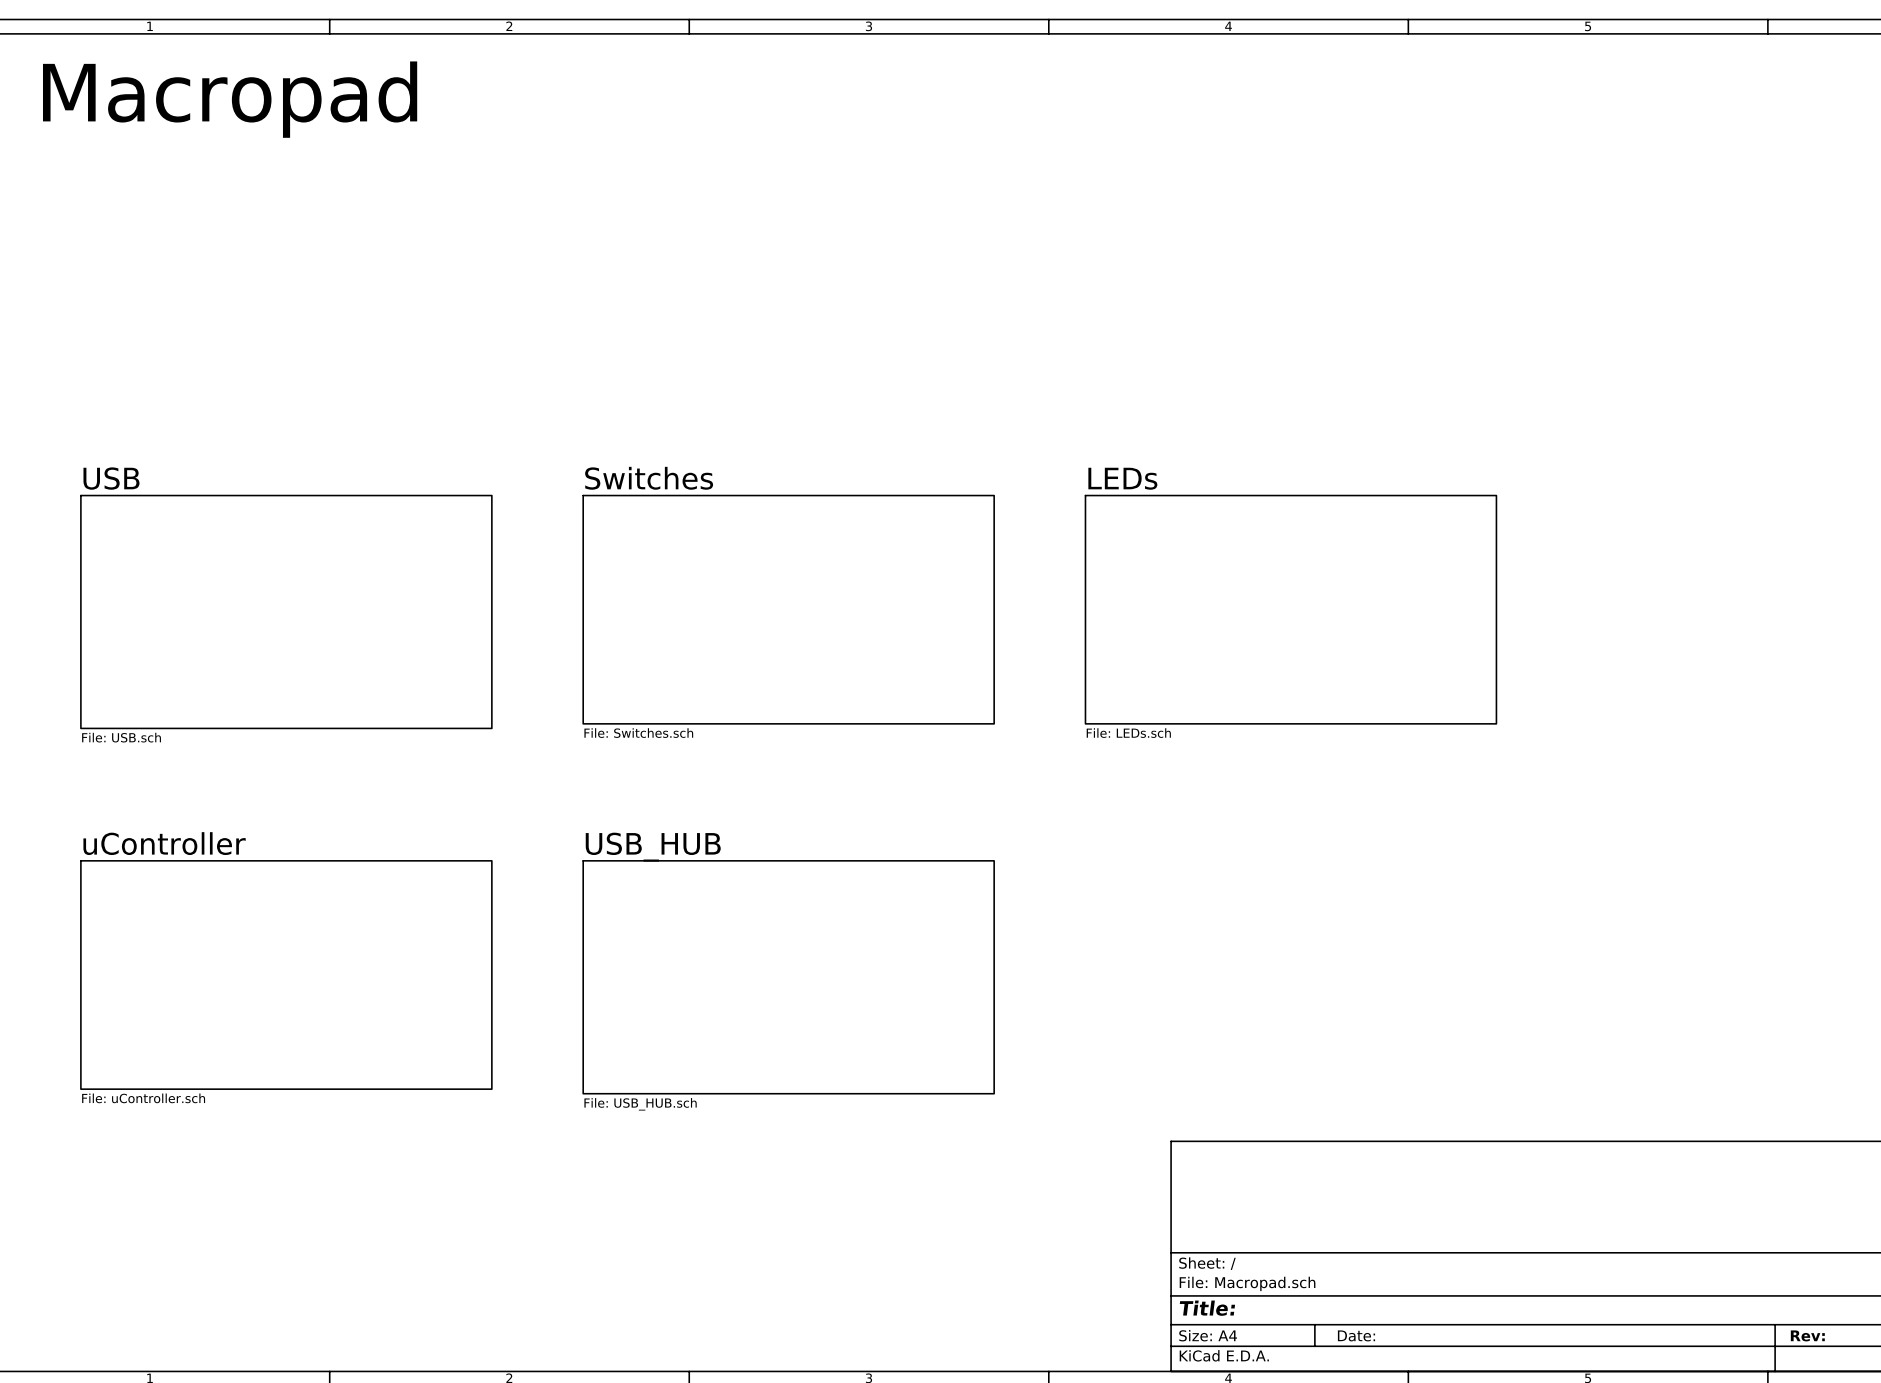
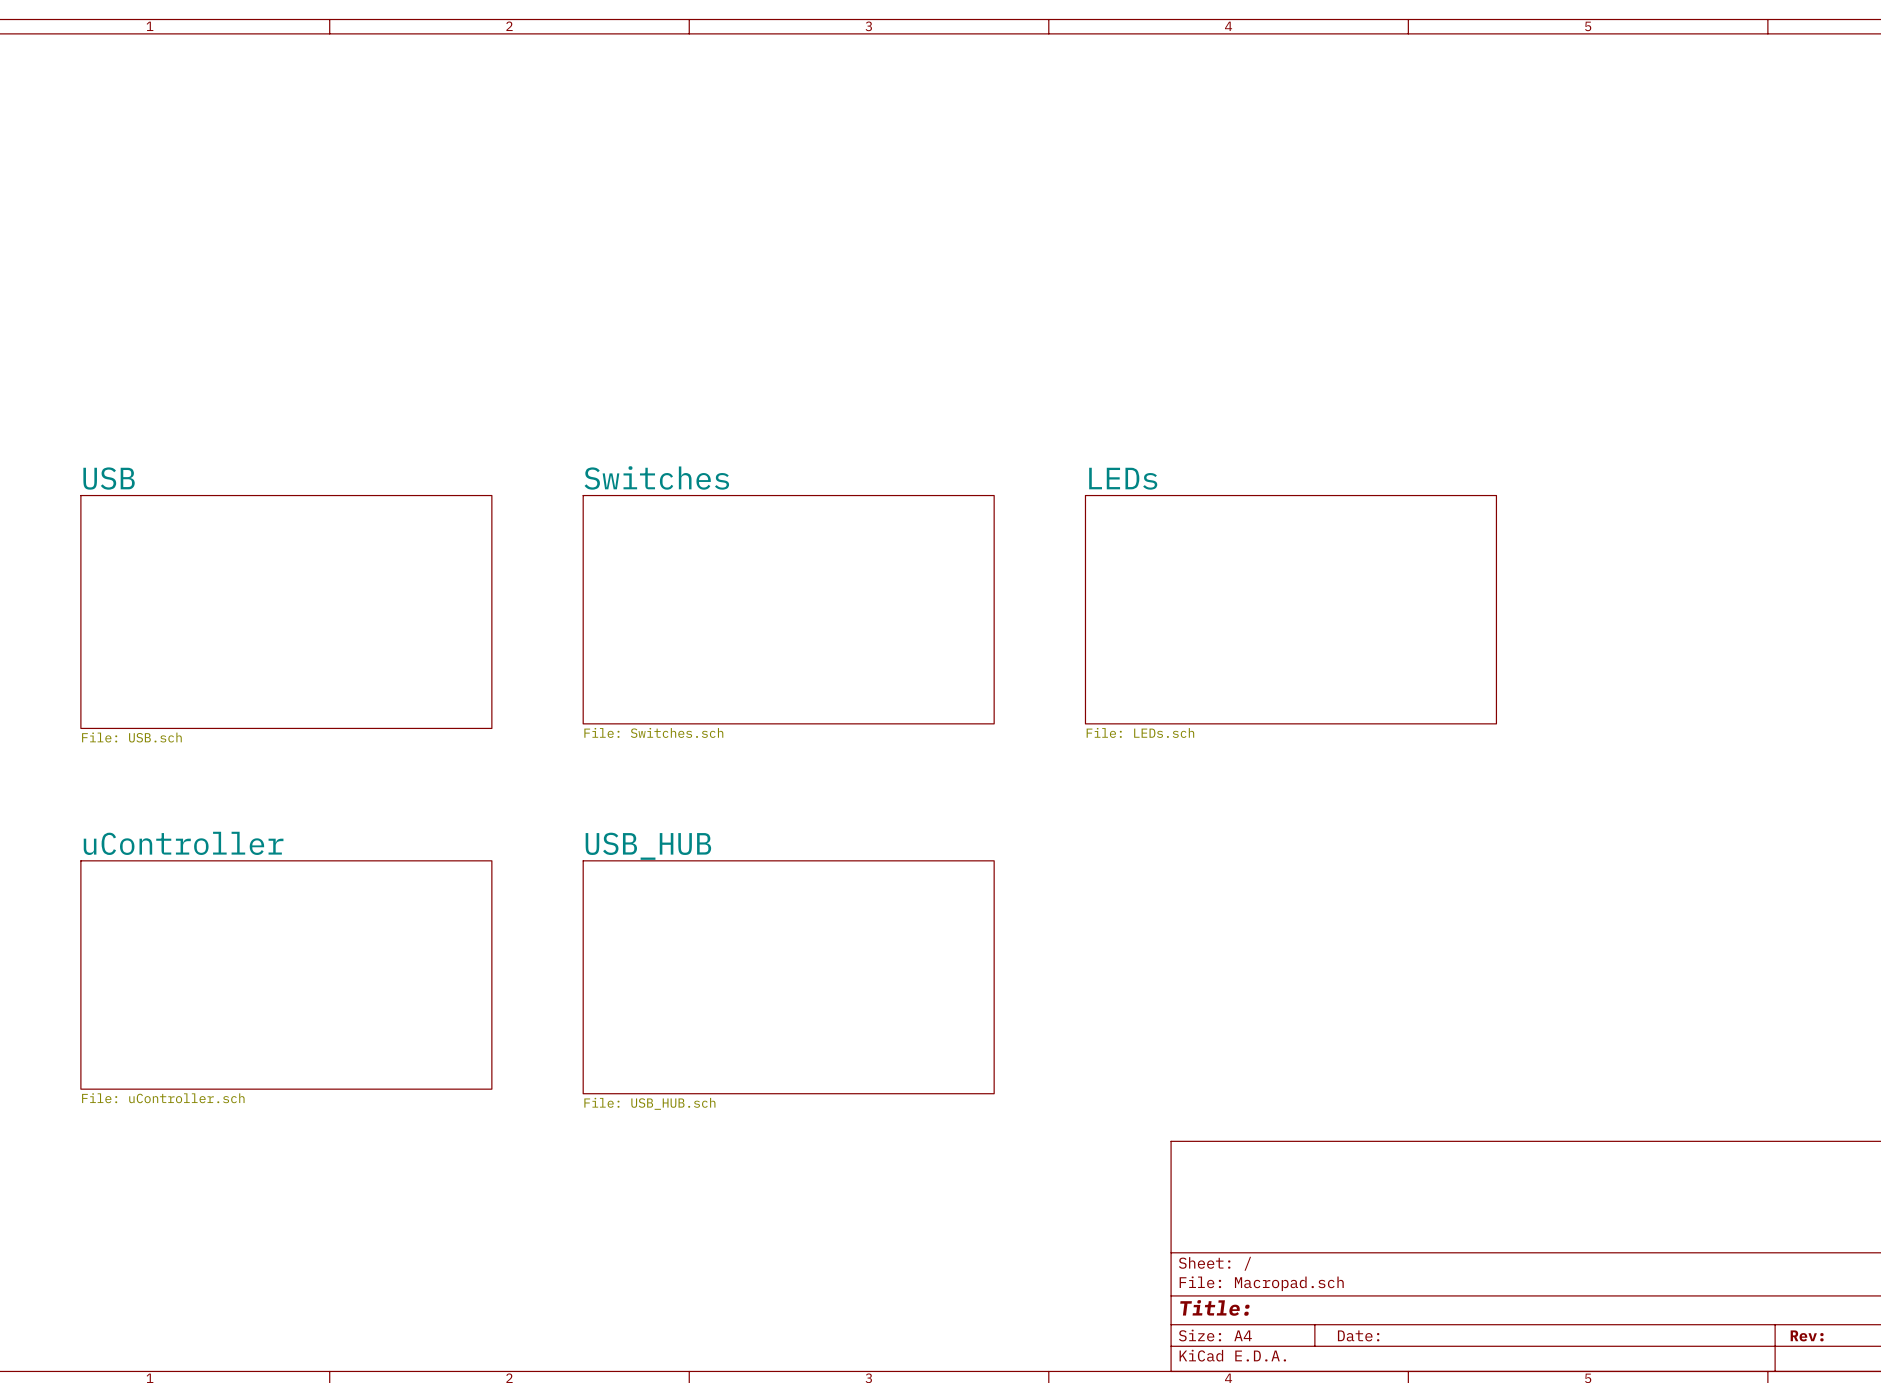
text: Macropad (230, 99) -> none

